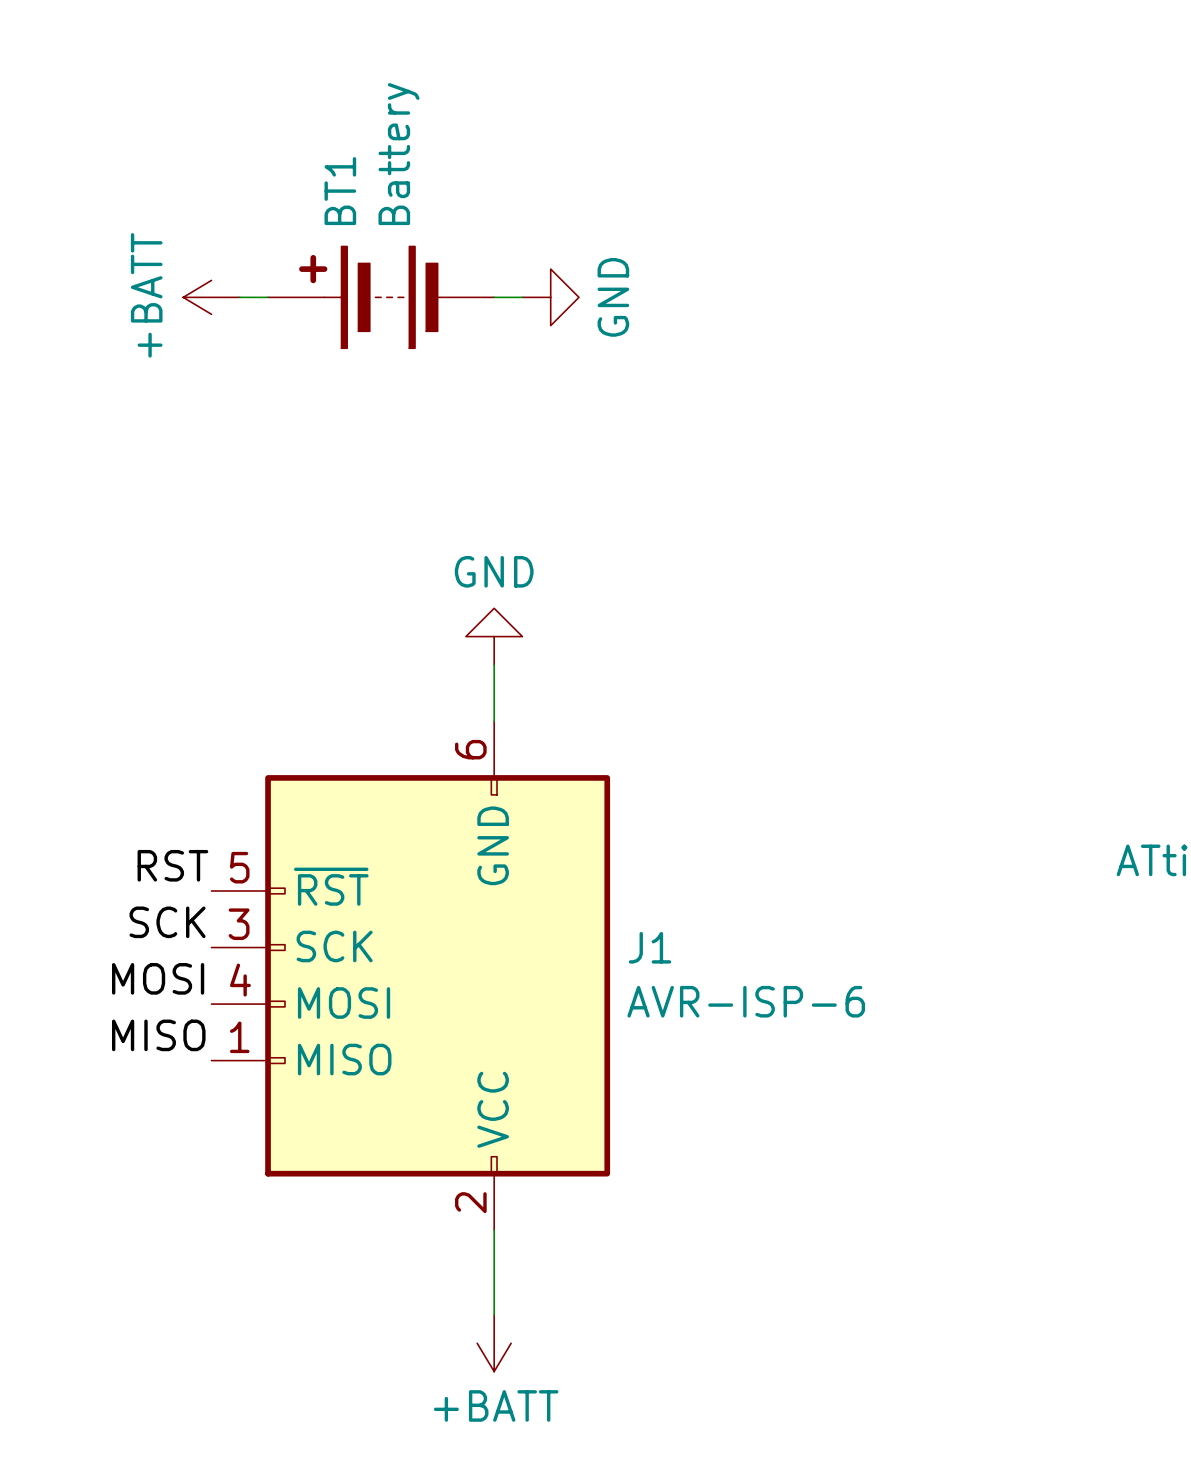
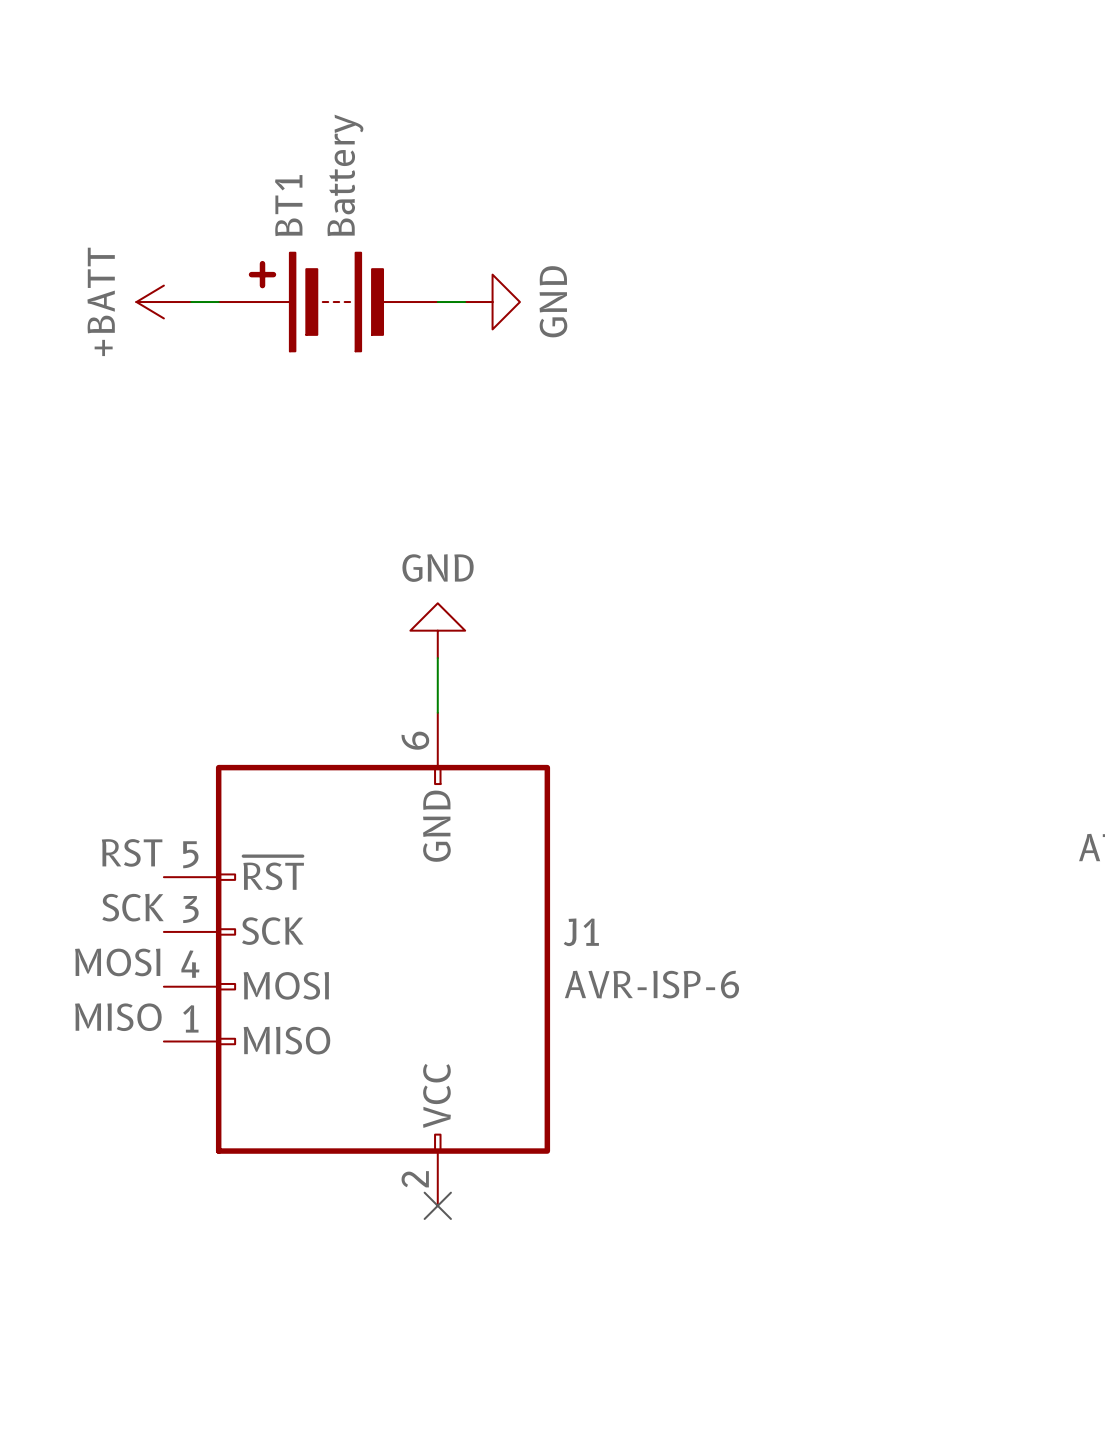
wire: (494, 1230) (494, 1315) -> none
no-connect mark: none -> (437, 1205)
power symbol: +BATT (494, 1343) -> none

